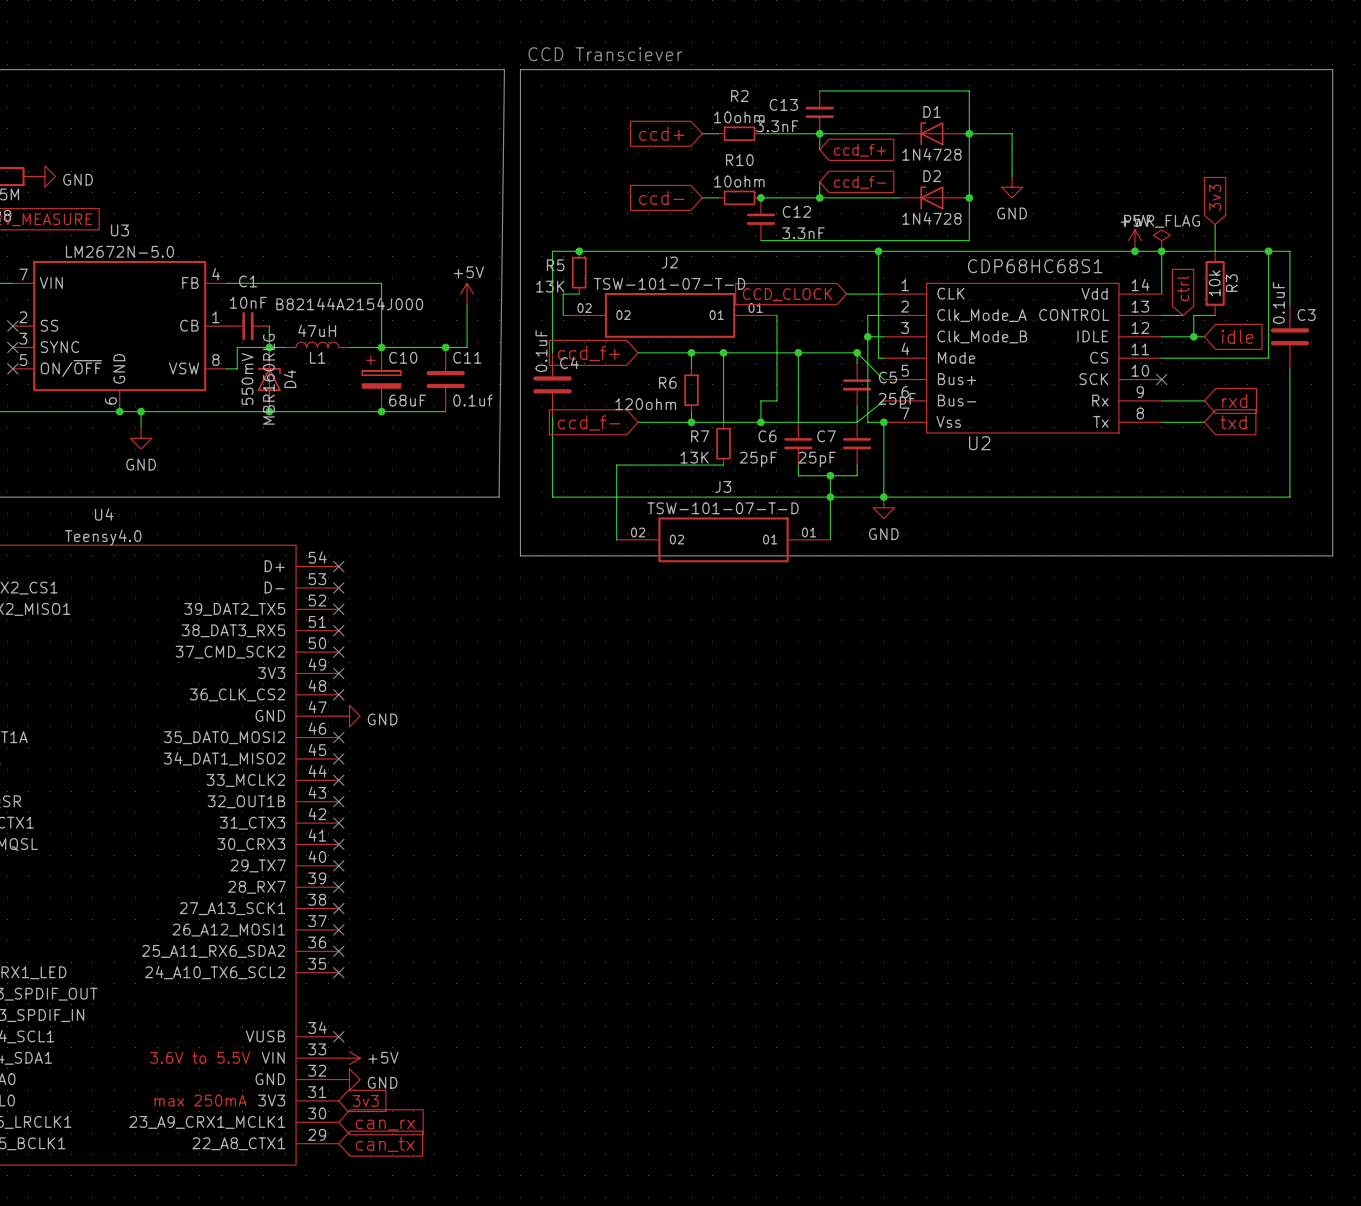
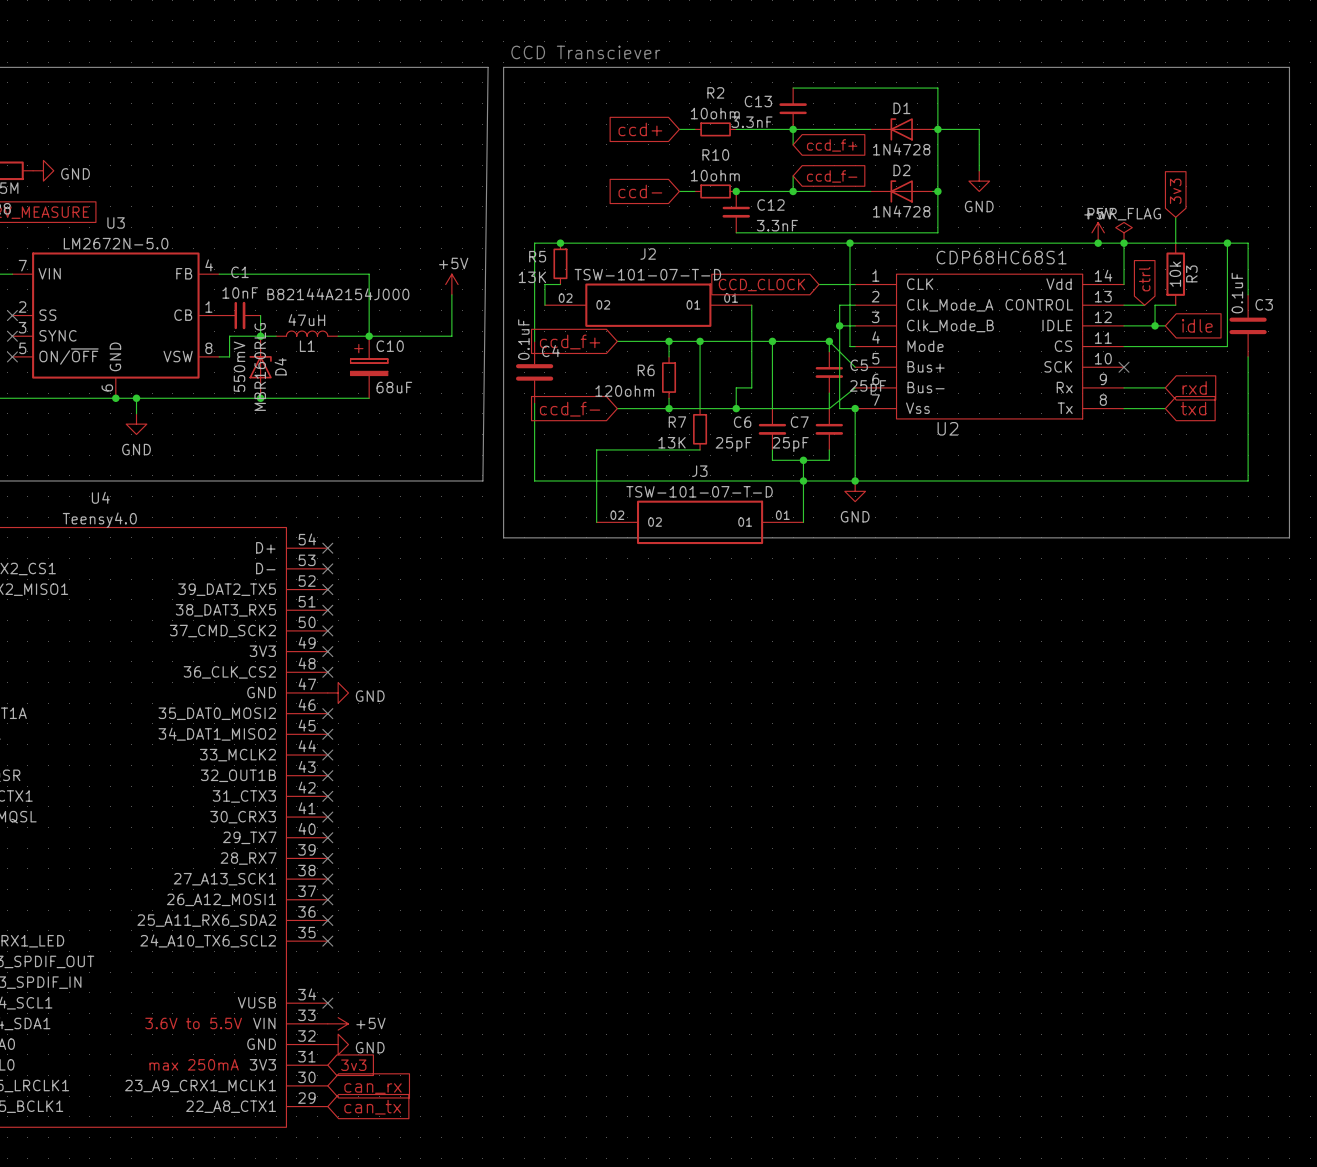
junction: (445, 347) -> none
C11: 0.1uf (445, 379) -> none
wire: (381, 411) (445, 411) -> none
junction: (381, 411) -> none

